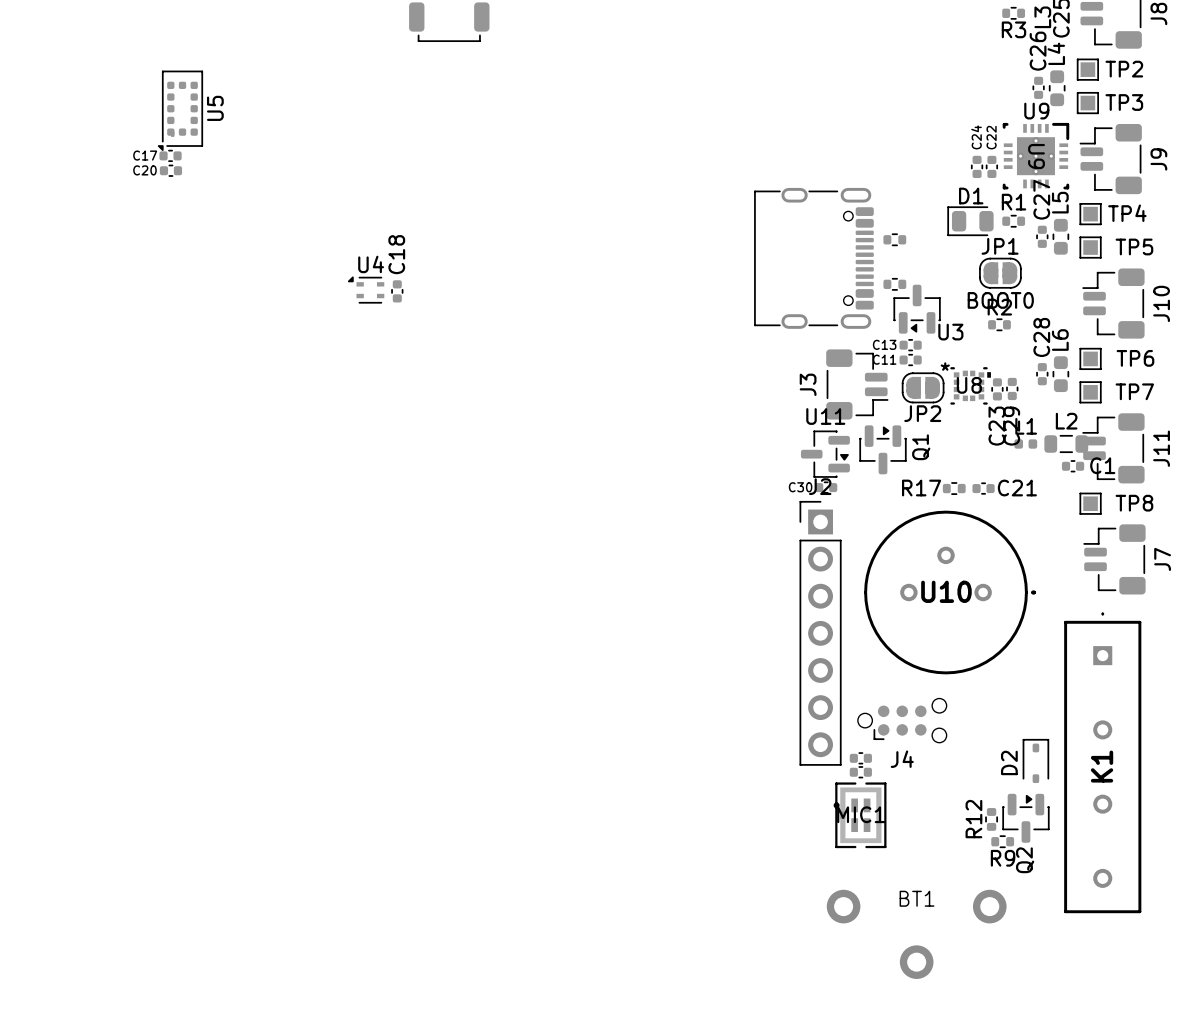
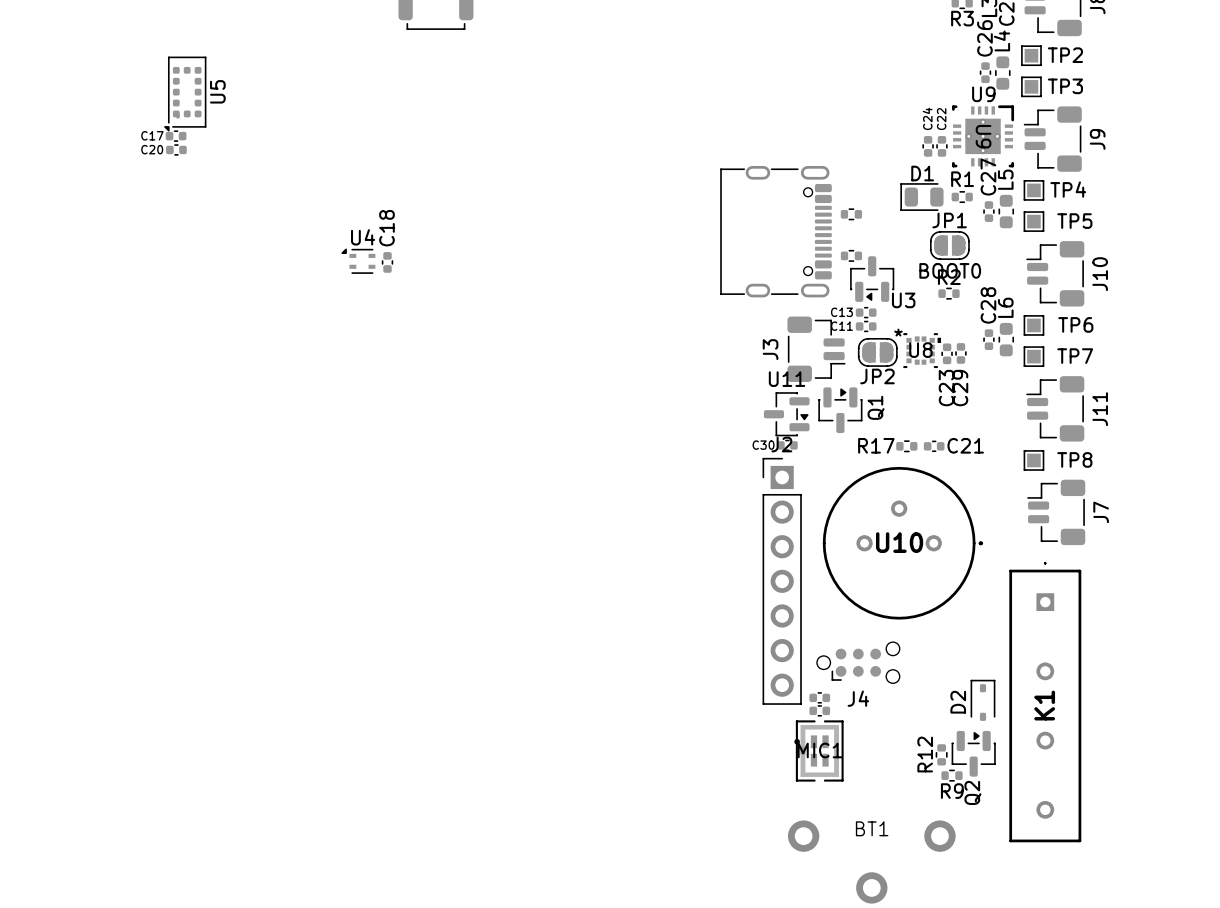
L1: (1025, 444) -> none
L2: (1066, 444) -> none
C1: (1073, 466) -> none

